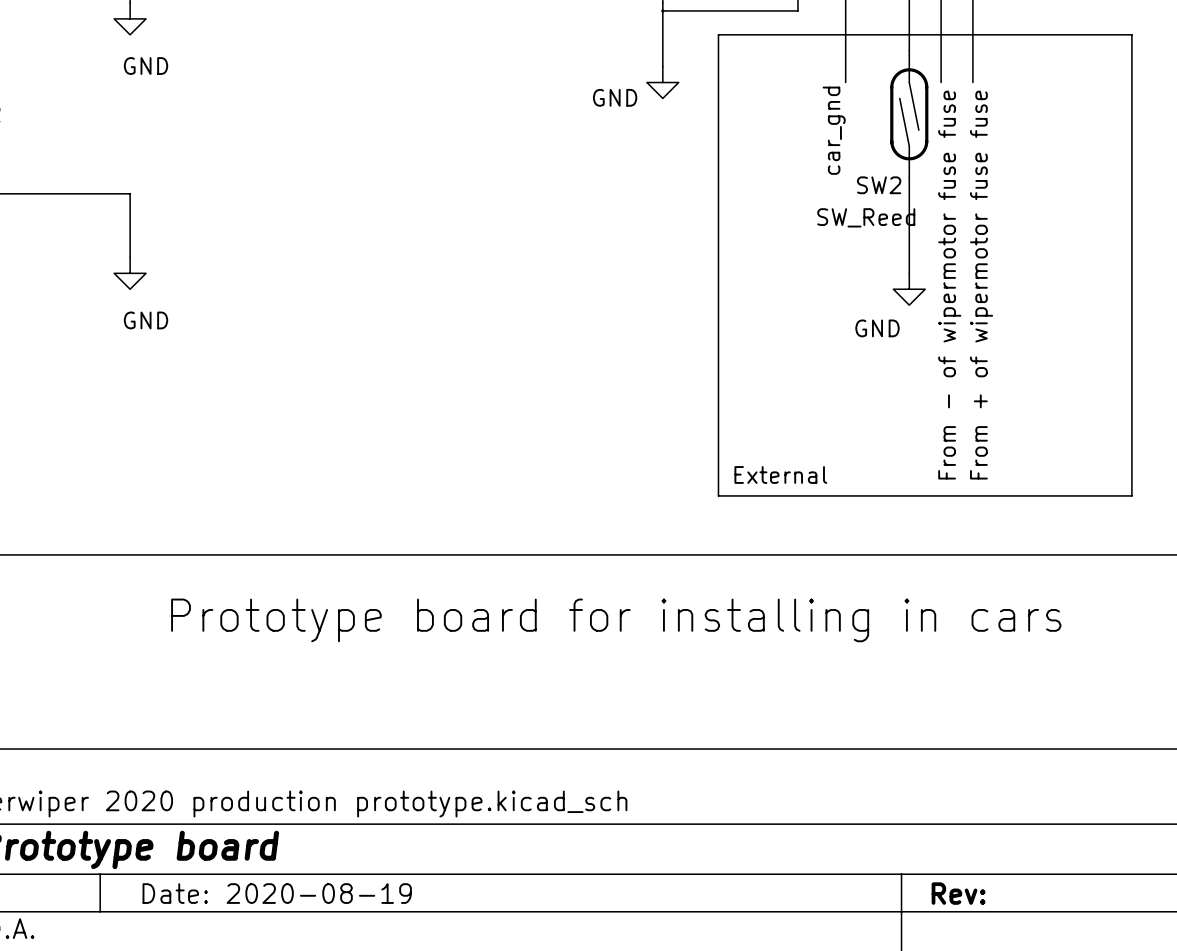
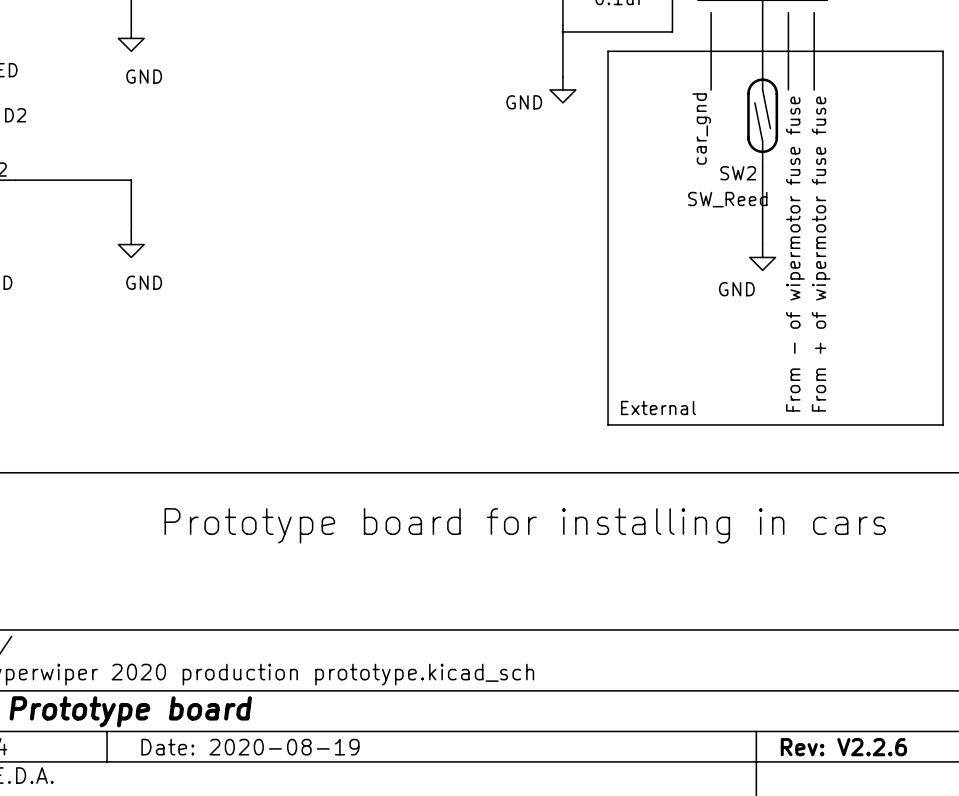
title block: Rev: (958, 893) -> Rev: V2.2.6 (843, 747)

